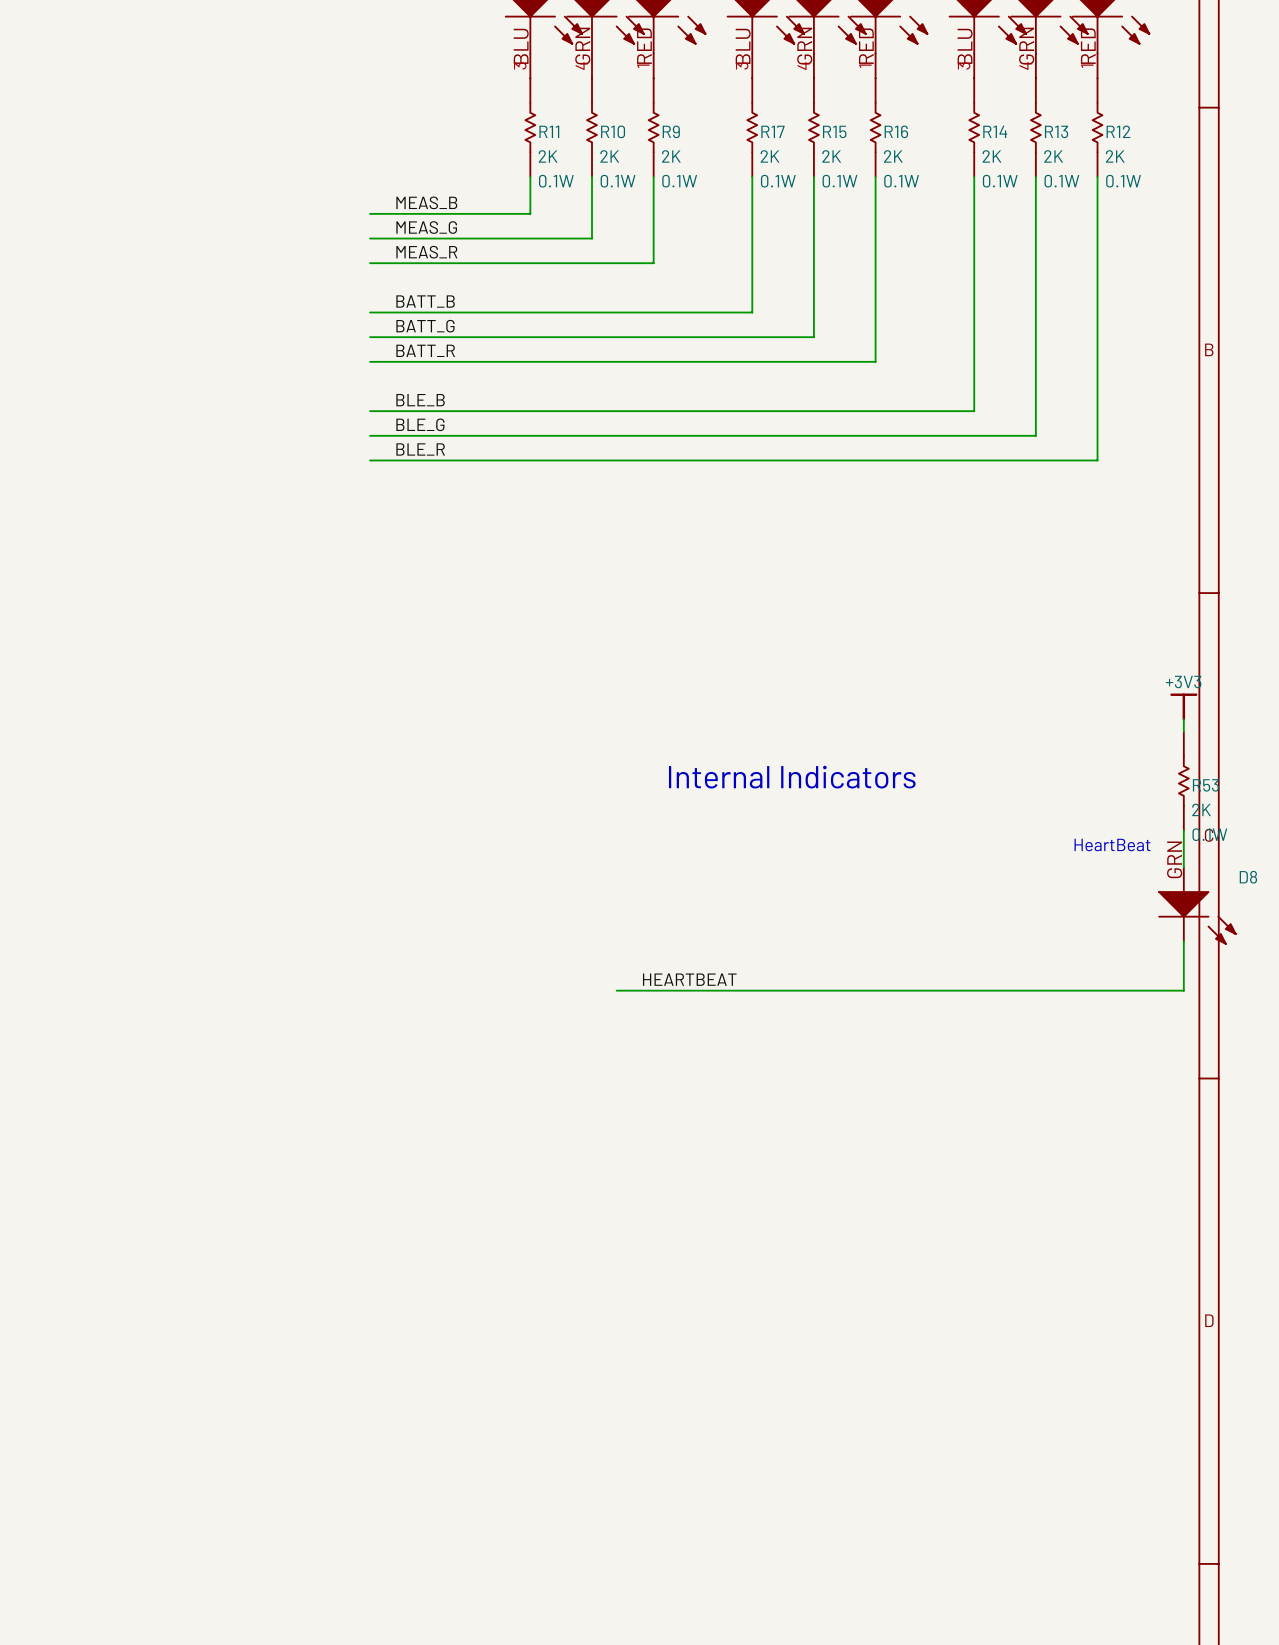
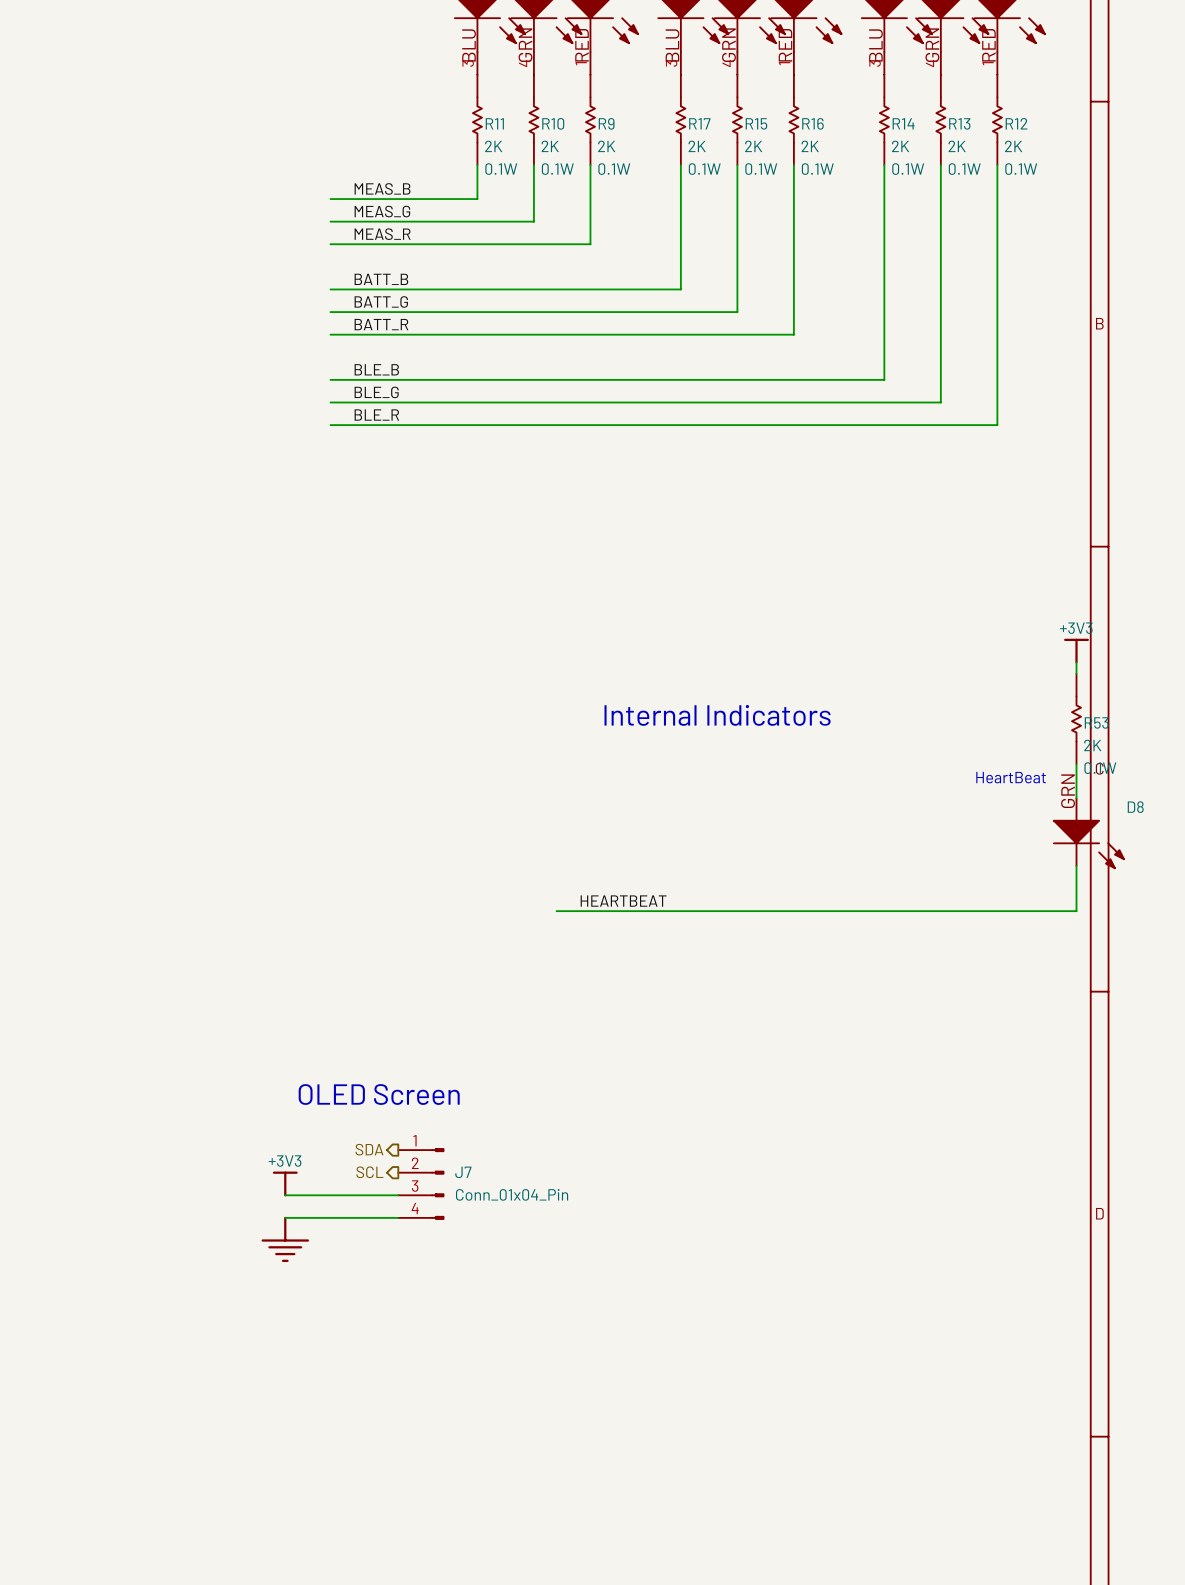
text: none -> OLED Screen (379, 1094)
hierarchical label: none -> SDA (369, 1149)
hierarchical label: none -> SCL (369, 1172)
power symbol: none -> +3V3 (285, 1184)
J7: none -> Conn_01x04_Pin (421, 1184)
wire: none -> (285, 1195) (398, 1195)
wire: none -> (285, 1217) (398, 1217)
power symbol: none -> (285, 1239)

